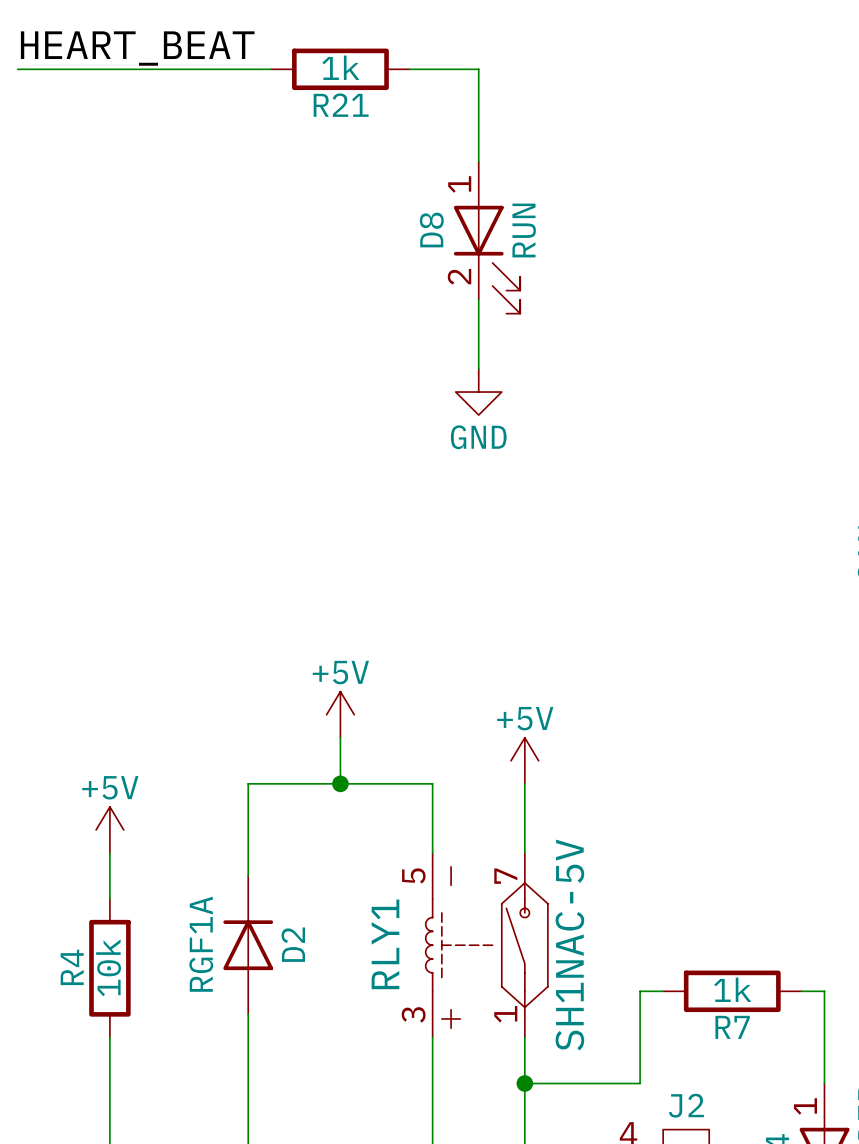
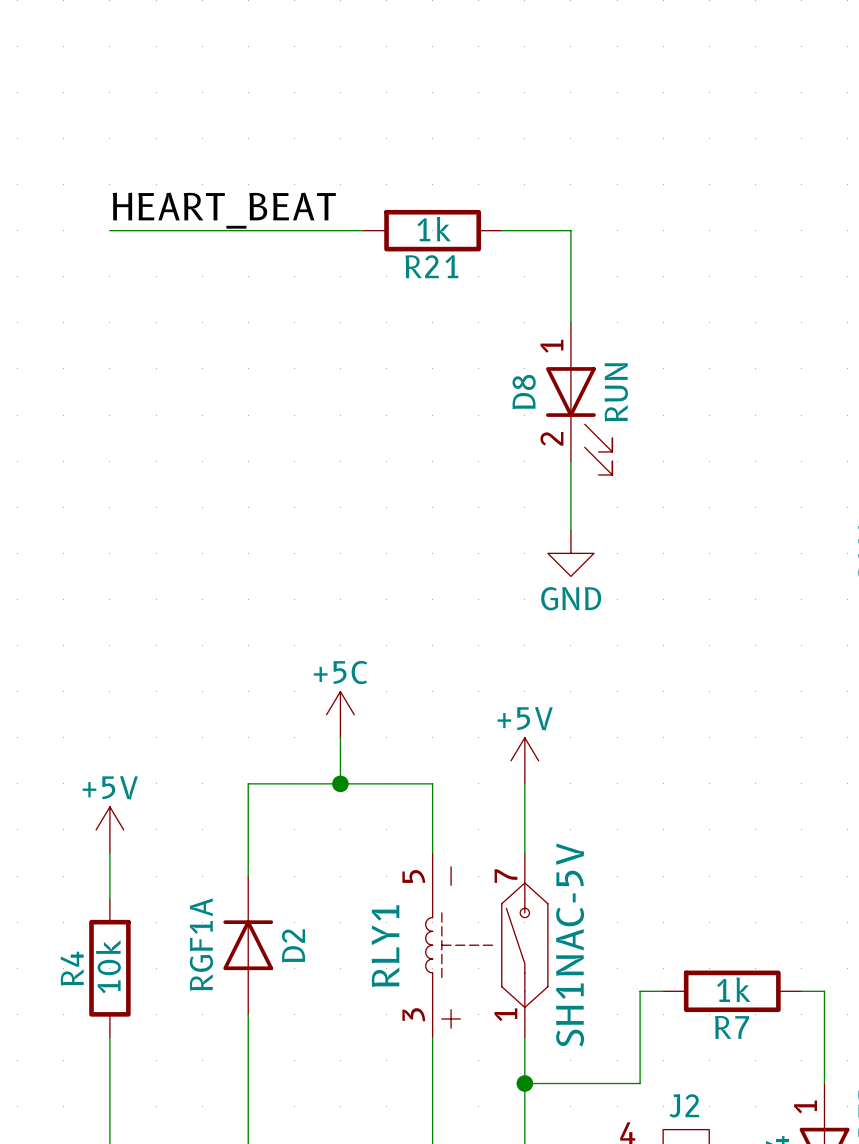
label position: HEART_BEAT (137, 48) -> HEART_BEAT (224, 210)
wire: (17, 69) (271, 69) -> (109, 230) (363, 230)
R21 position: (340, 69) -> (432, 230)
wire: (409, 69) (478, 69) (478, 161) -> (501, 230) (570, 230) (570, 322)
D8 position: (487, 237) -> (579, 398)
wire: (478, 299) (478, 368) -> (570, 461) (570, 530)
power symbol position: GND (478, 392) -> GND (570, 553)
power symbol: +5V (340, 714) -> +5C (340, 714)

